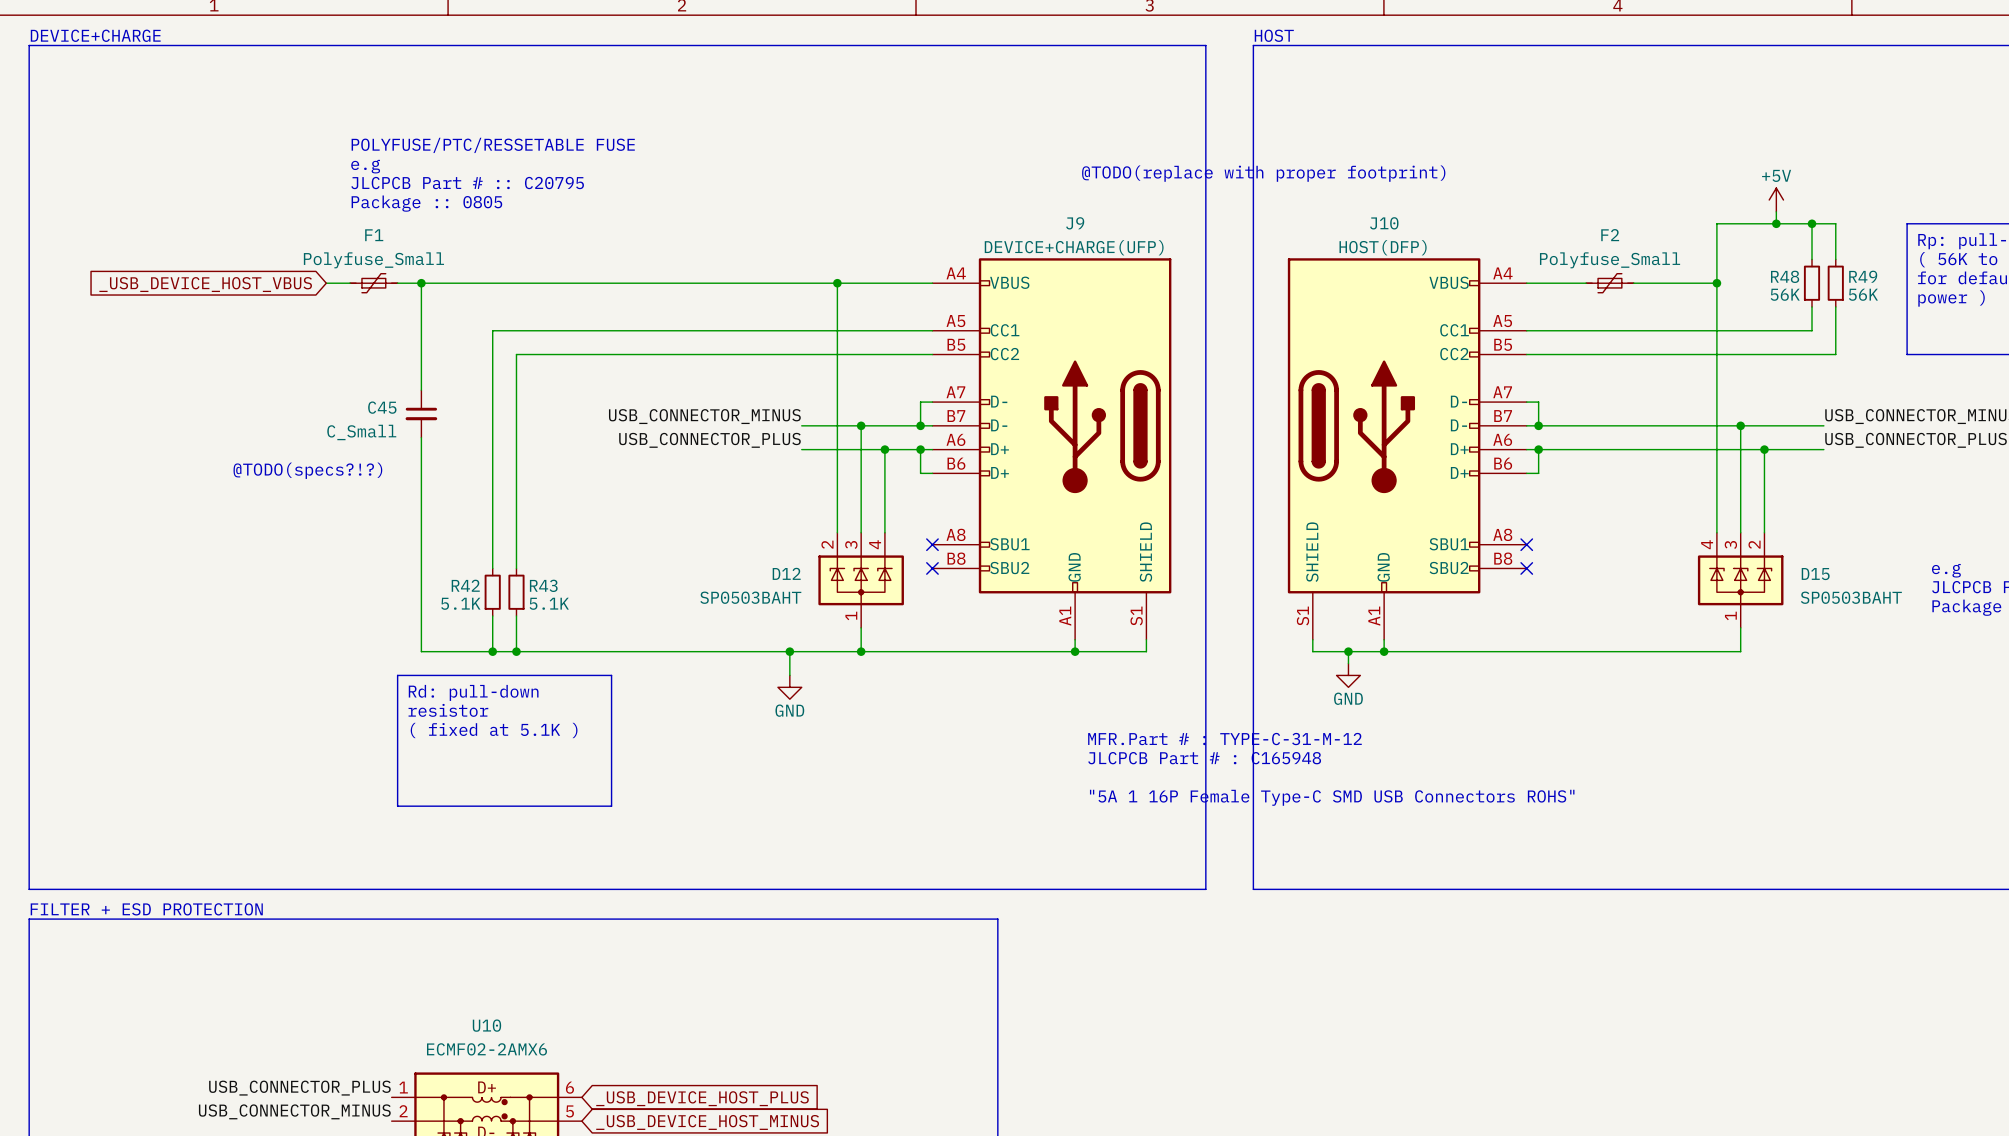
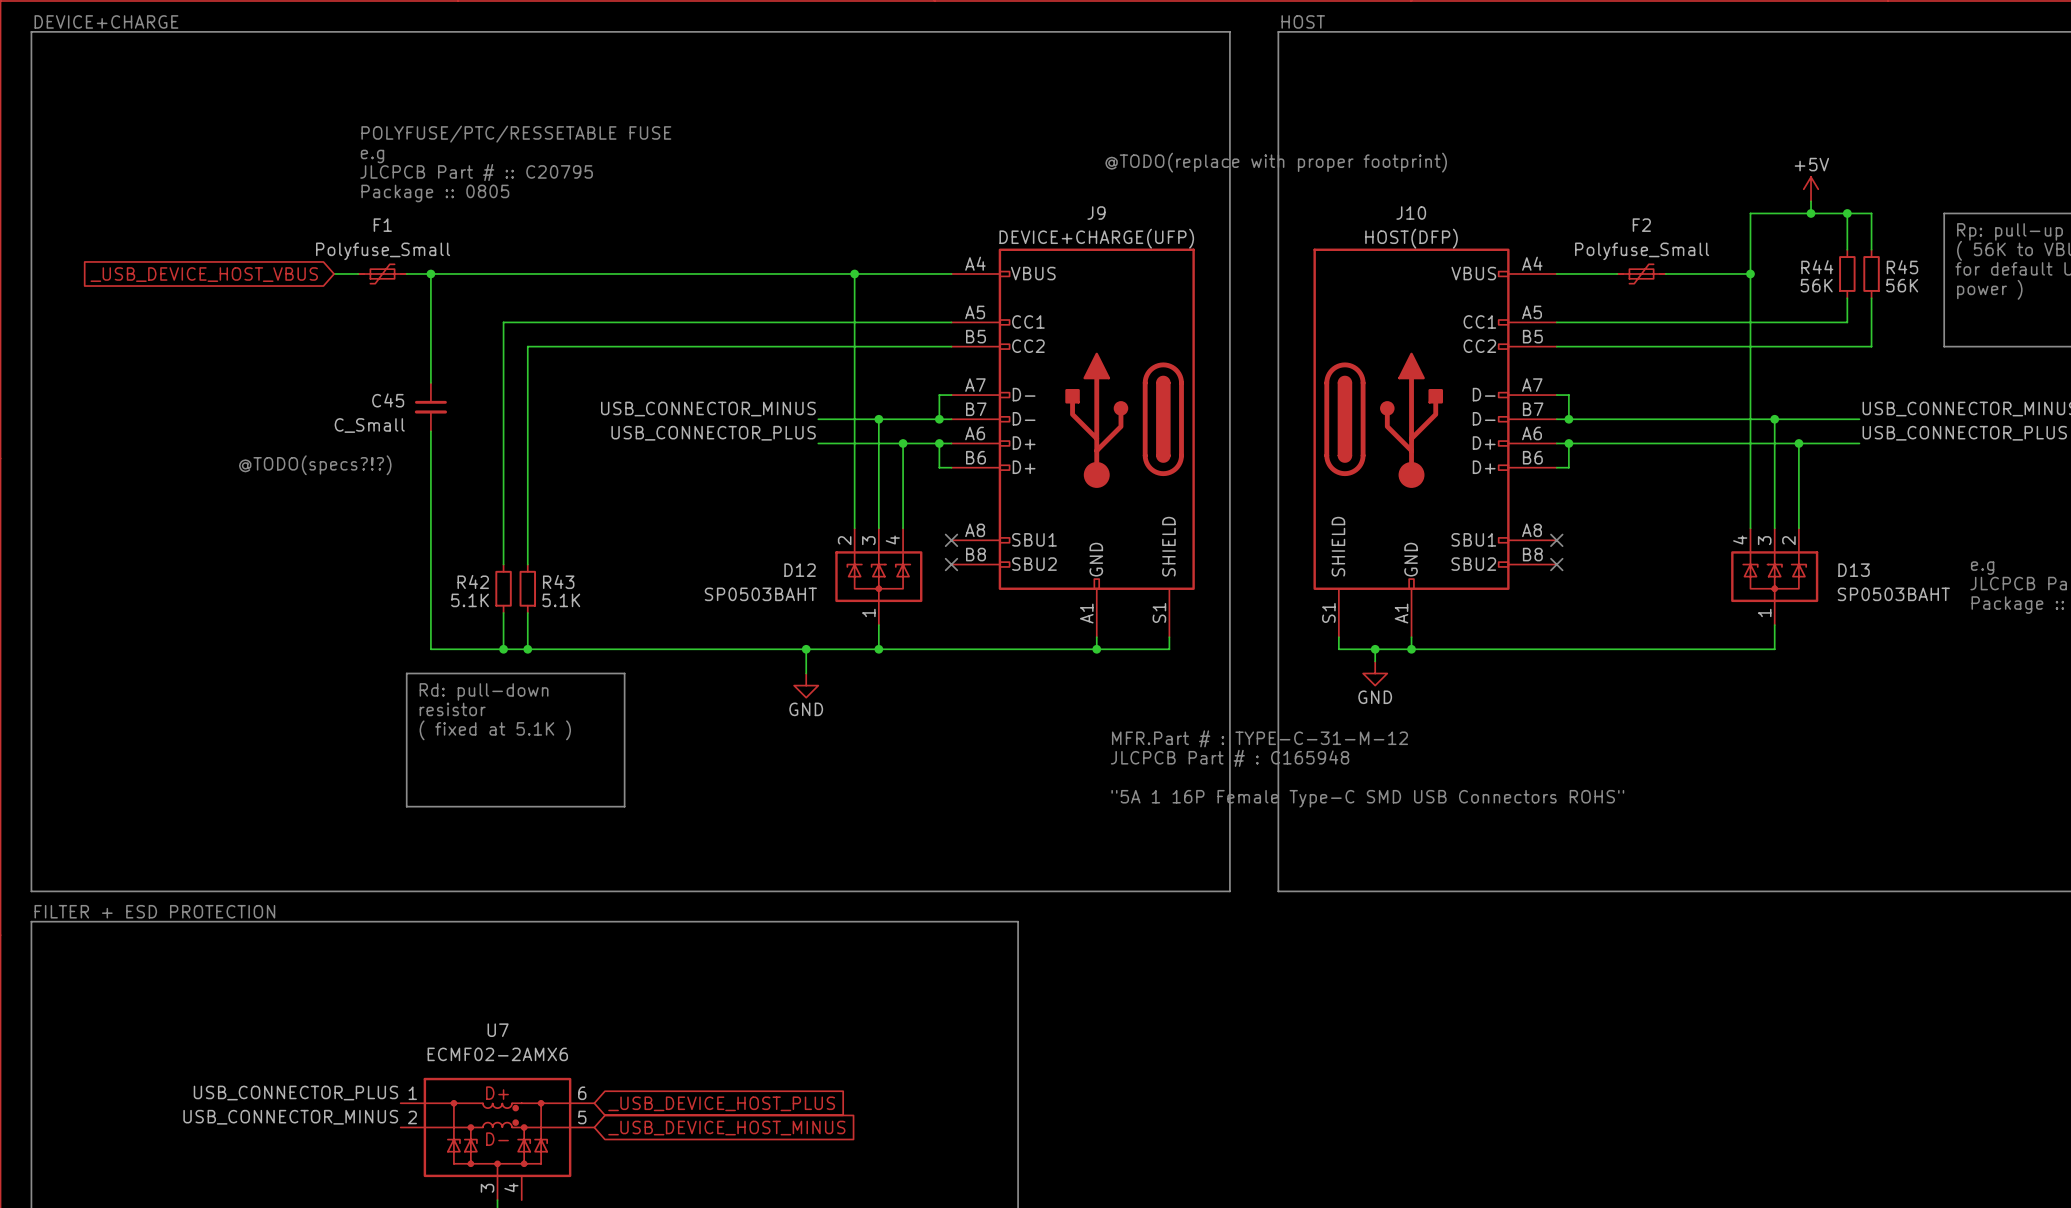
R48 name: R48 (1785, 276) -> R44 (1817, 267)
R49 name: R49 (1863, 276) -> R45 (1902, 267)
D15 name: D15 (1815, 574) -> D13 (1854, 570)
U10 name: U10 (486, 1025) -> U7 (498, 1030)

